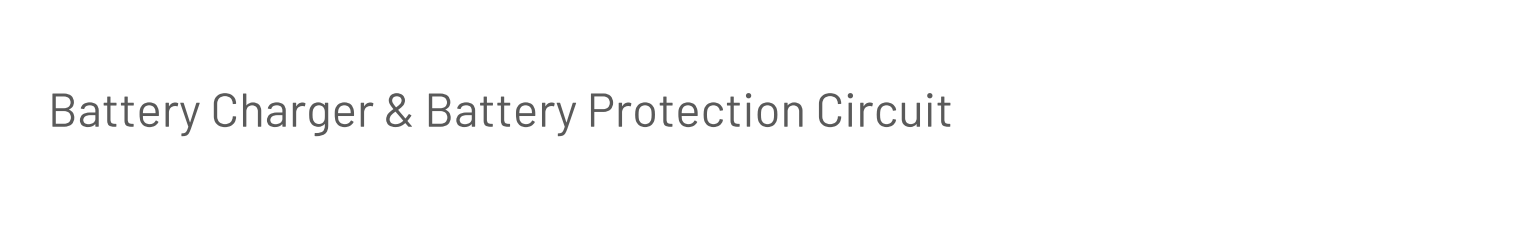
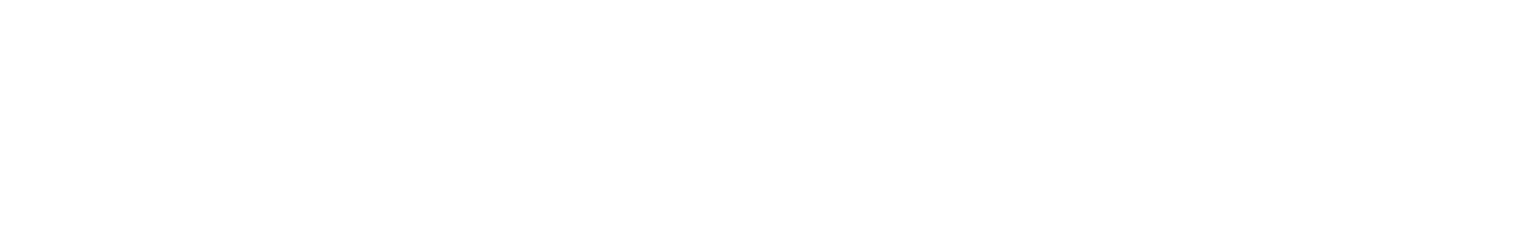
text: Battery Charger & Battery Protection Circuit (501, 114) -> none

